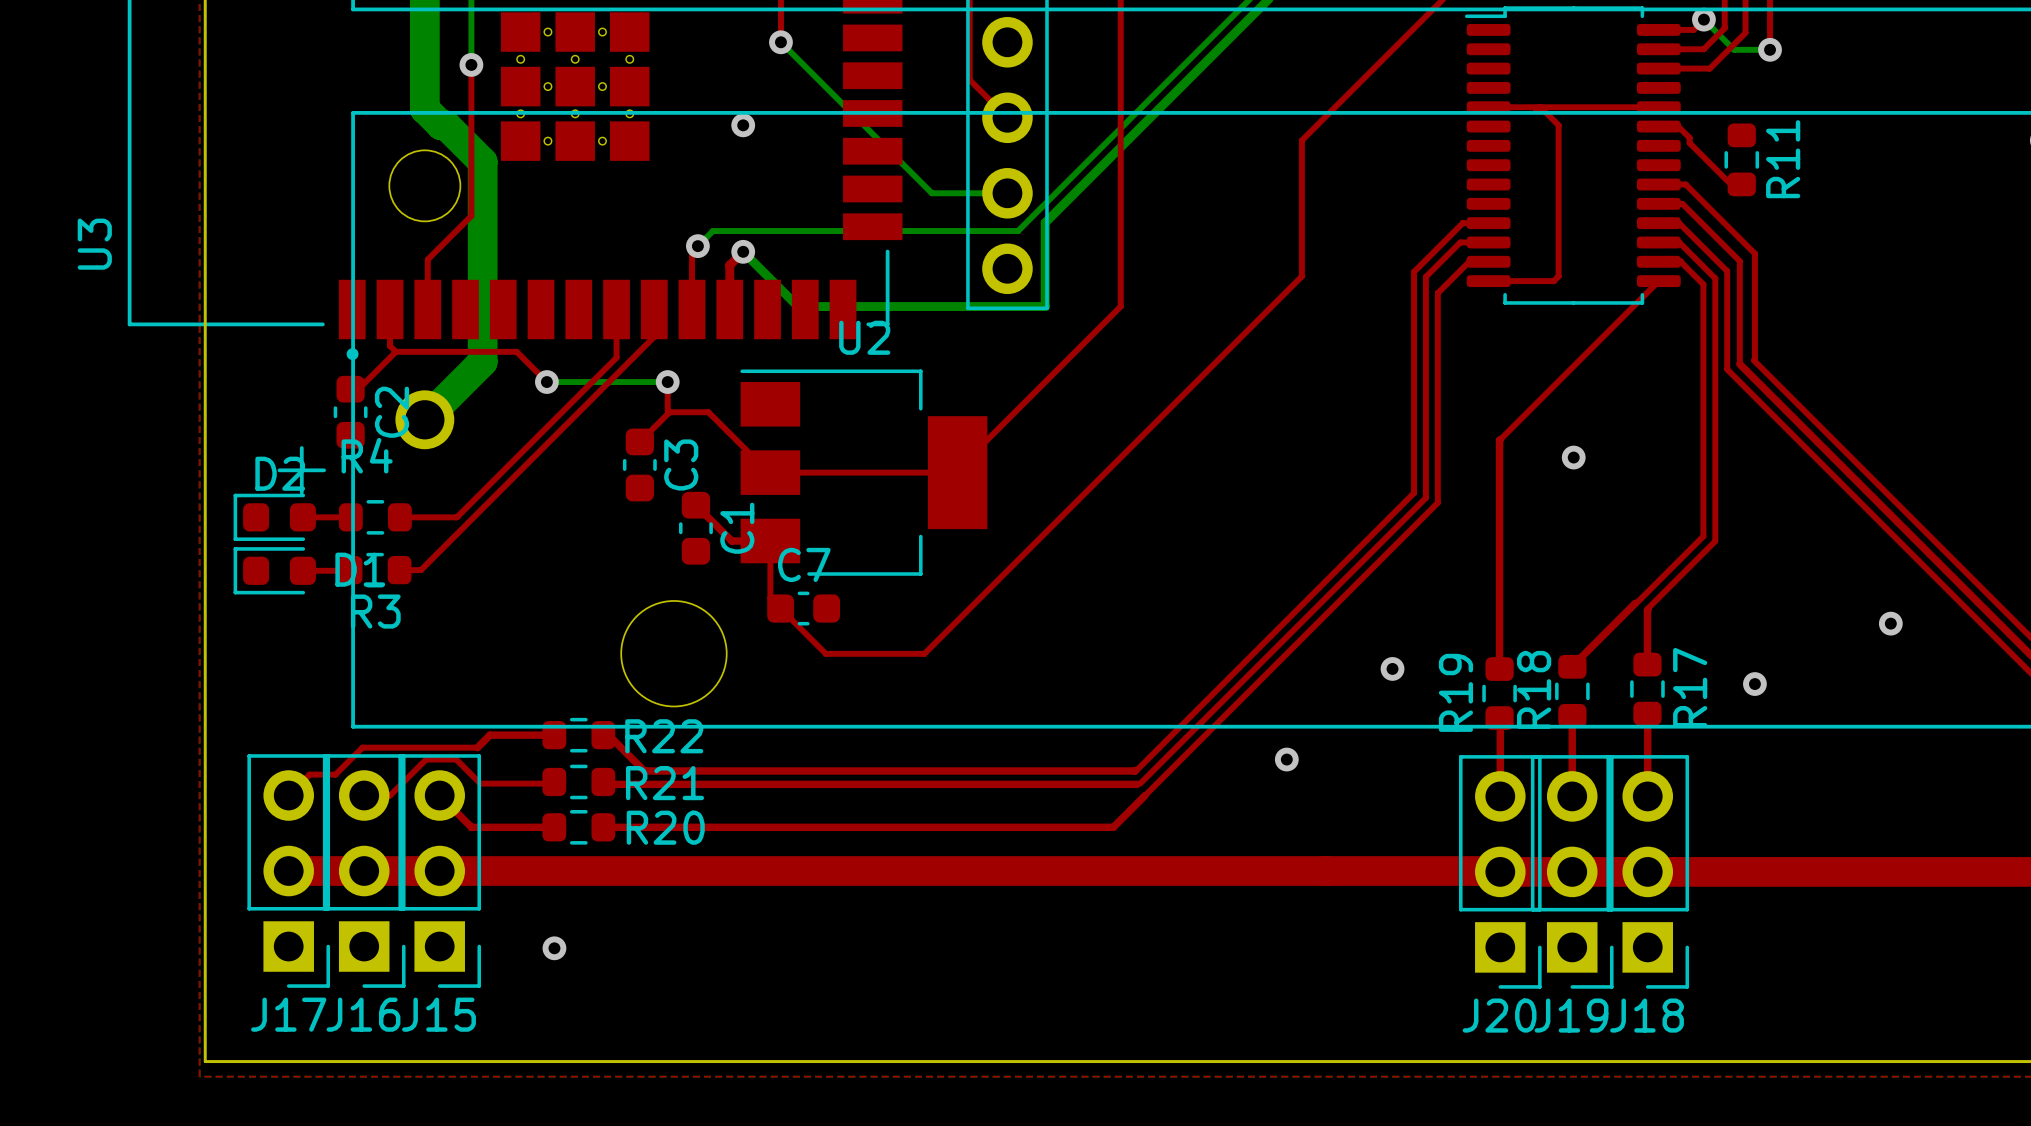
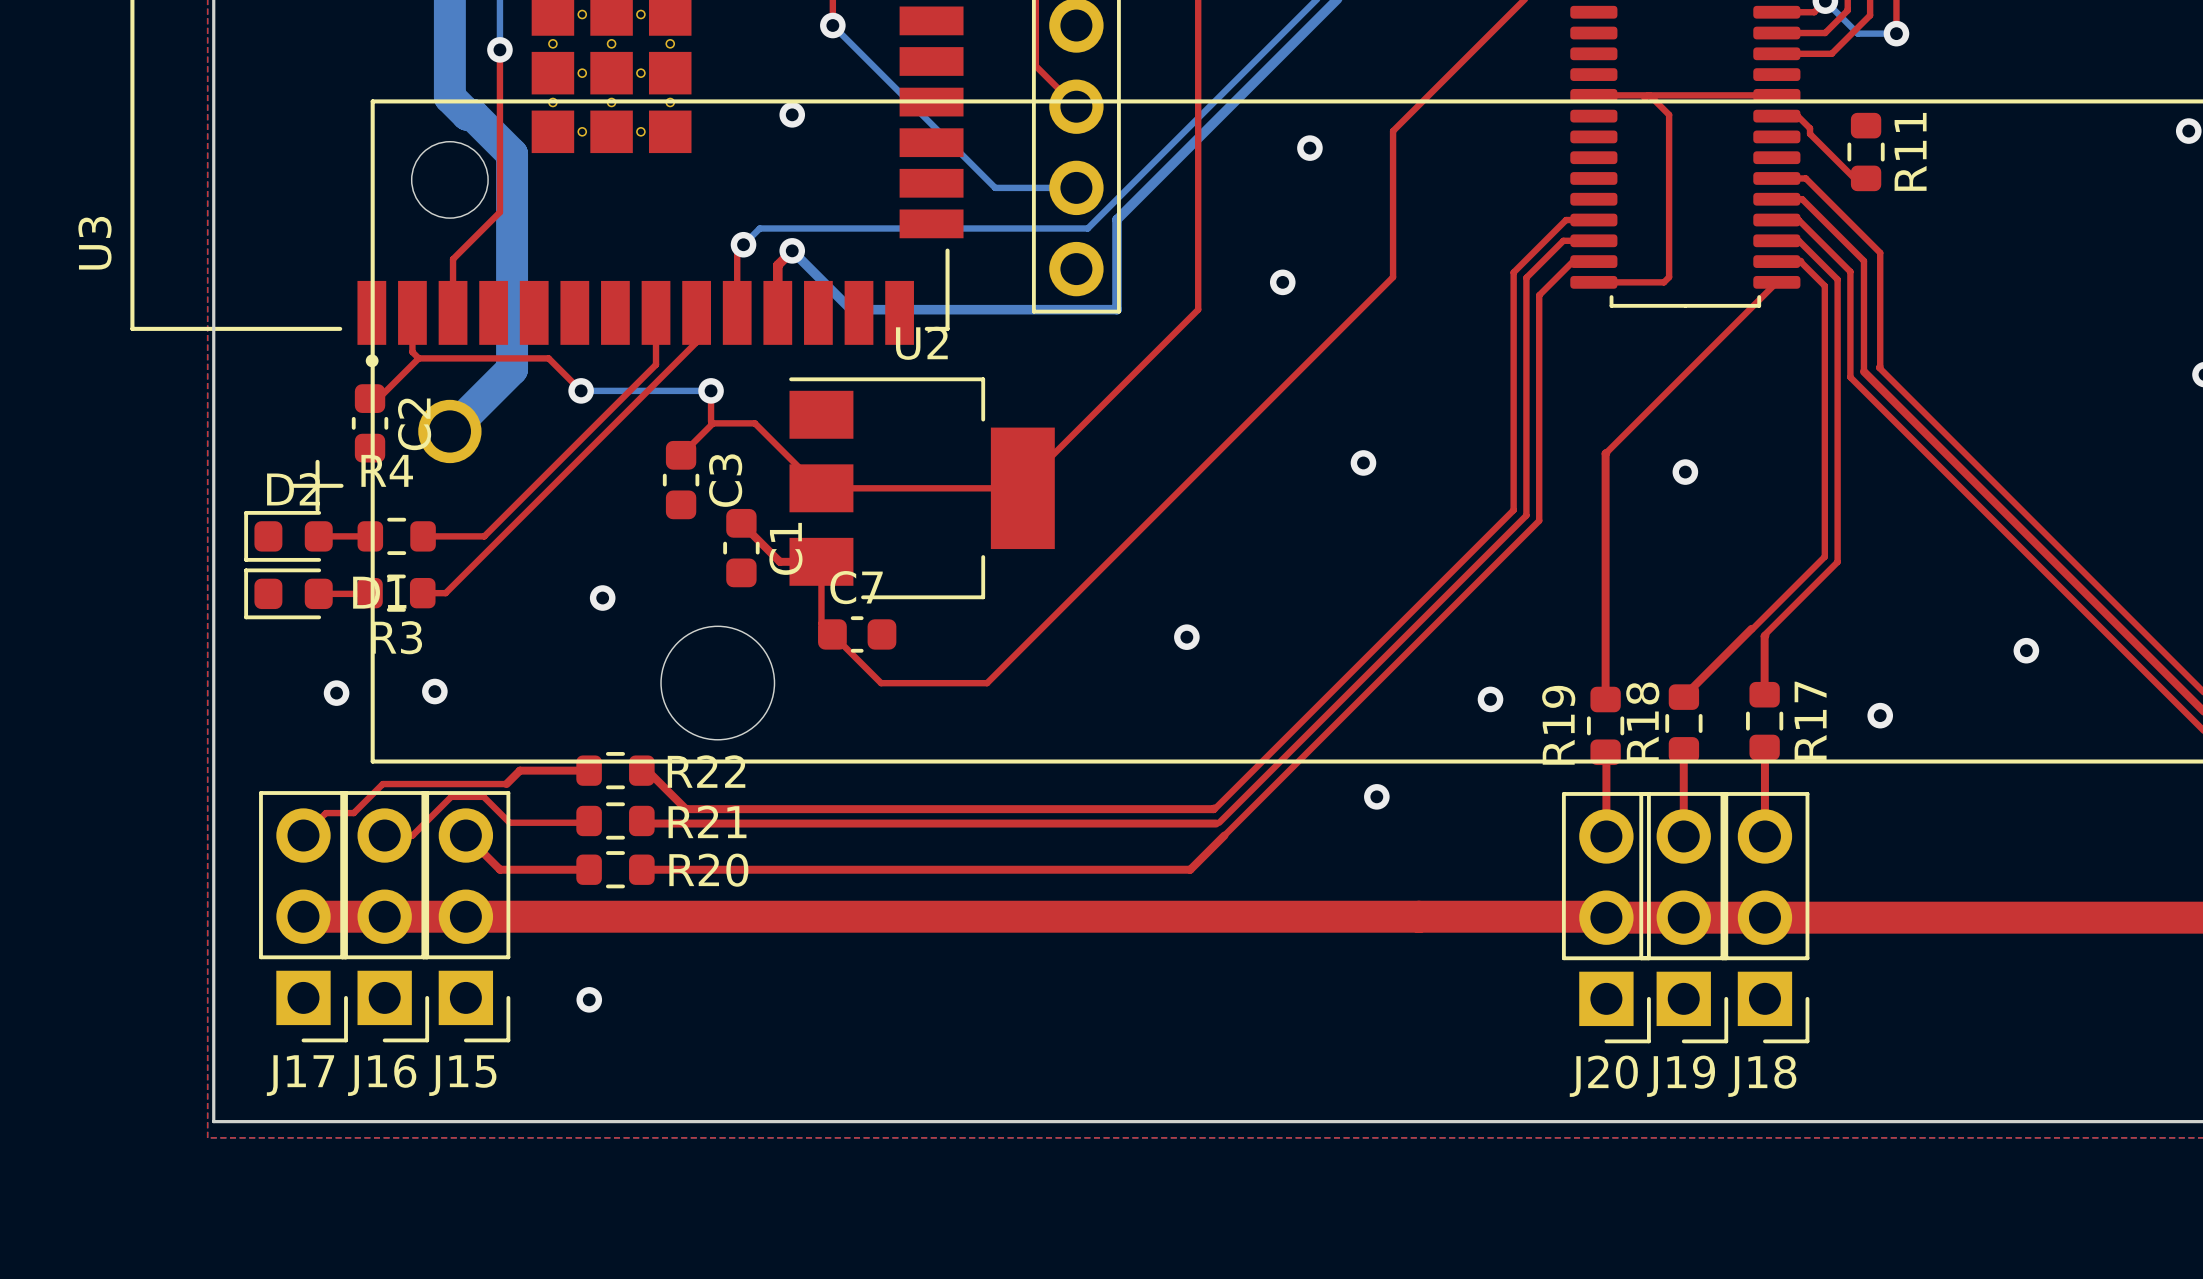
via: none -> (1309, 148)
via: none -> (1282, 282)
via: none -> (1363, 462)
via: none -> (602, 598)
via: none -> (1186, 637)
via: none -> (434, 691)
via: none -> (336, 693)

